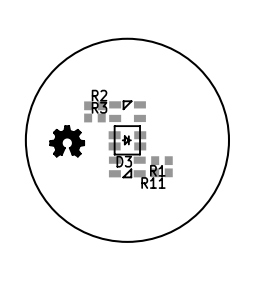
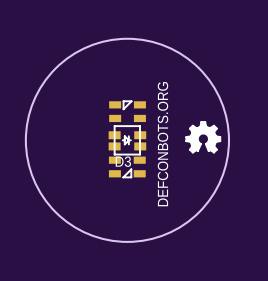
R2: (94, 105) -> none
R3: (94, 117) -> none
drawing position: (67, 141) -> (203, 137)
text: none -> DEFCONBOTS.ORG (162, 144)
R1: (161, 160) -> none
R11: (161, 172) -> none

